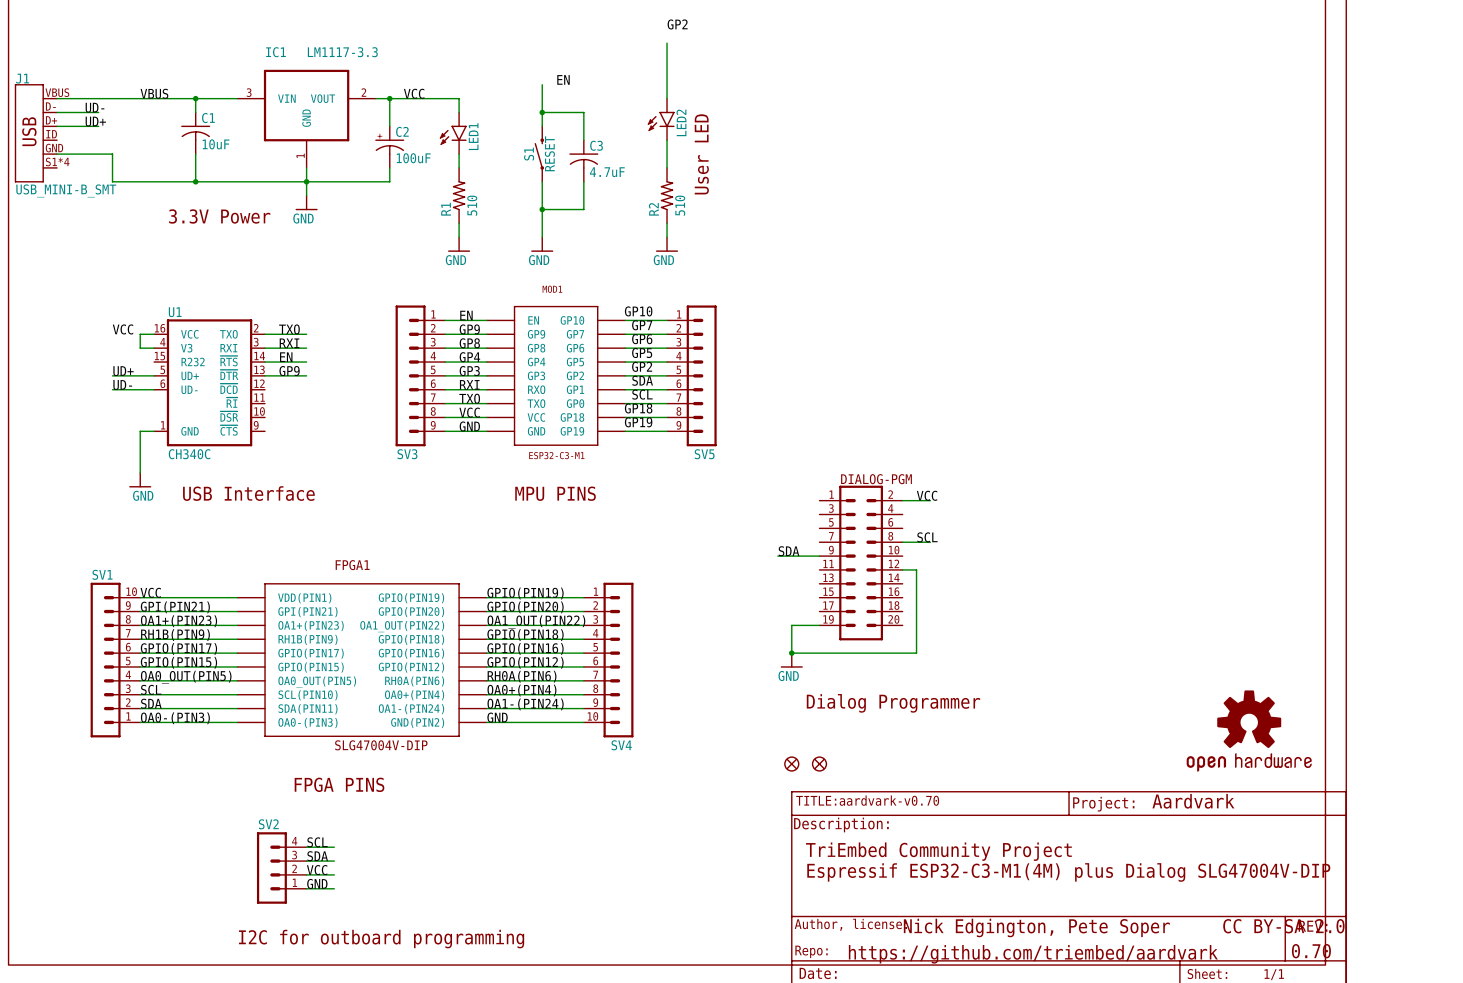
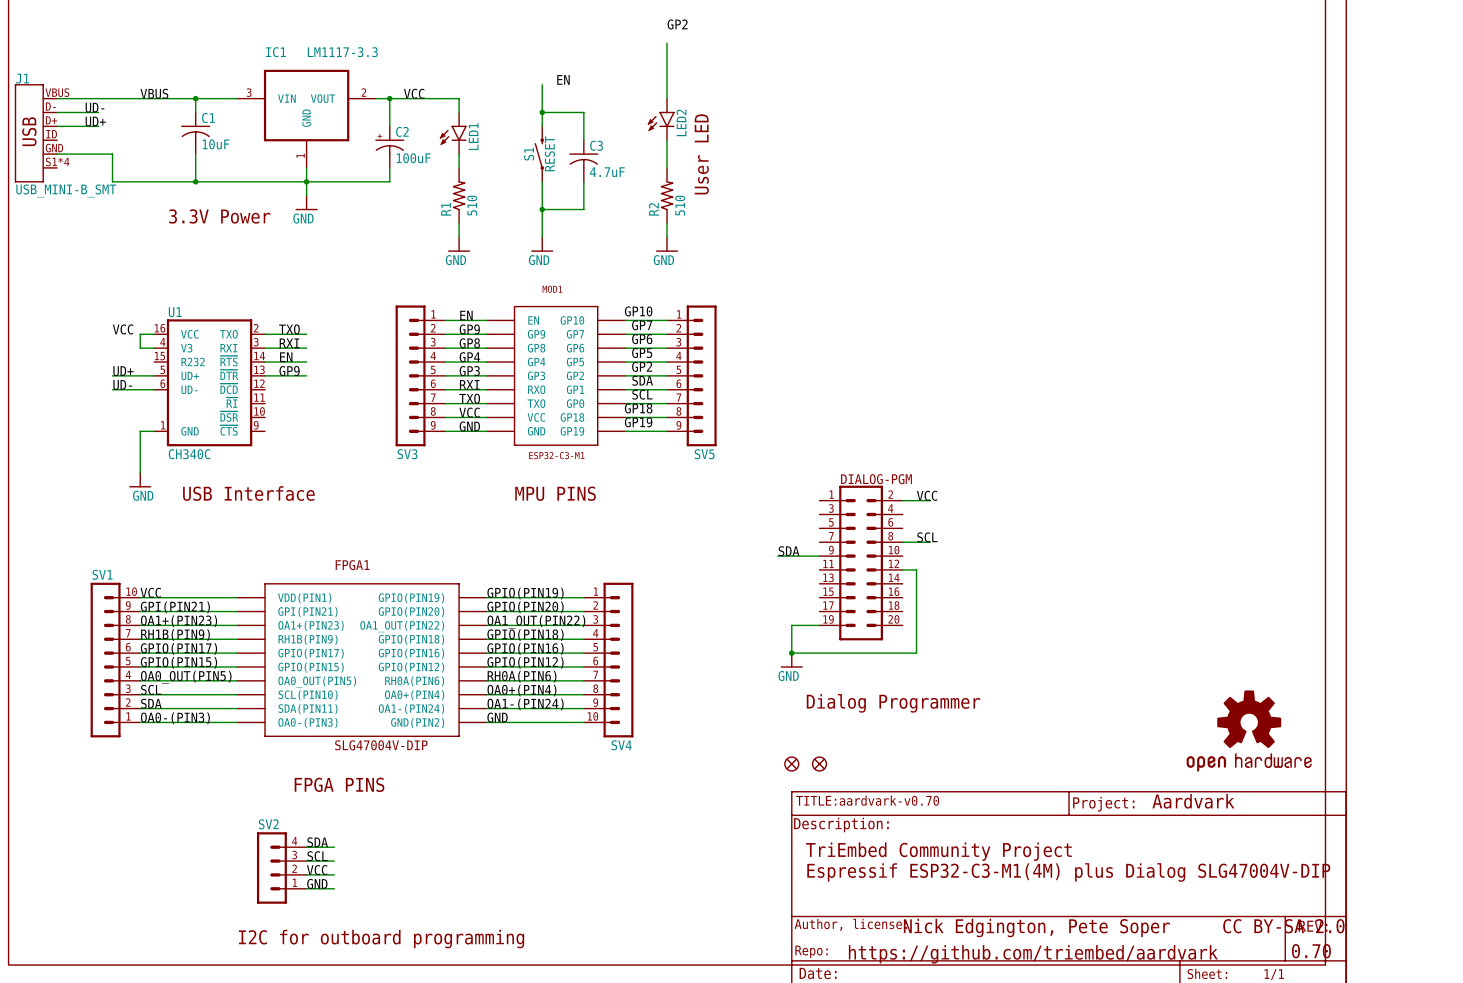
label: SCL (317, 842) -> SDA (317, 842)
label: SDA (317, 856) -> SCL (317, 856)

